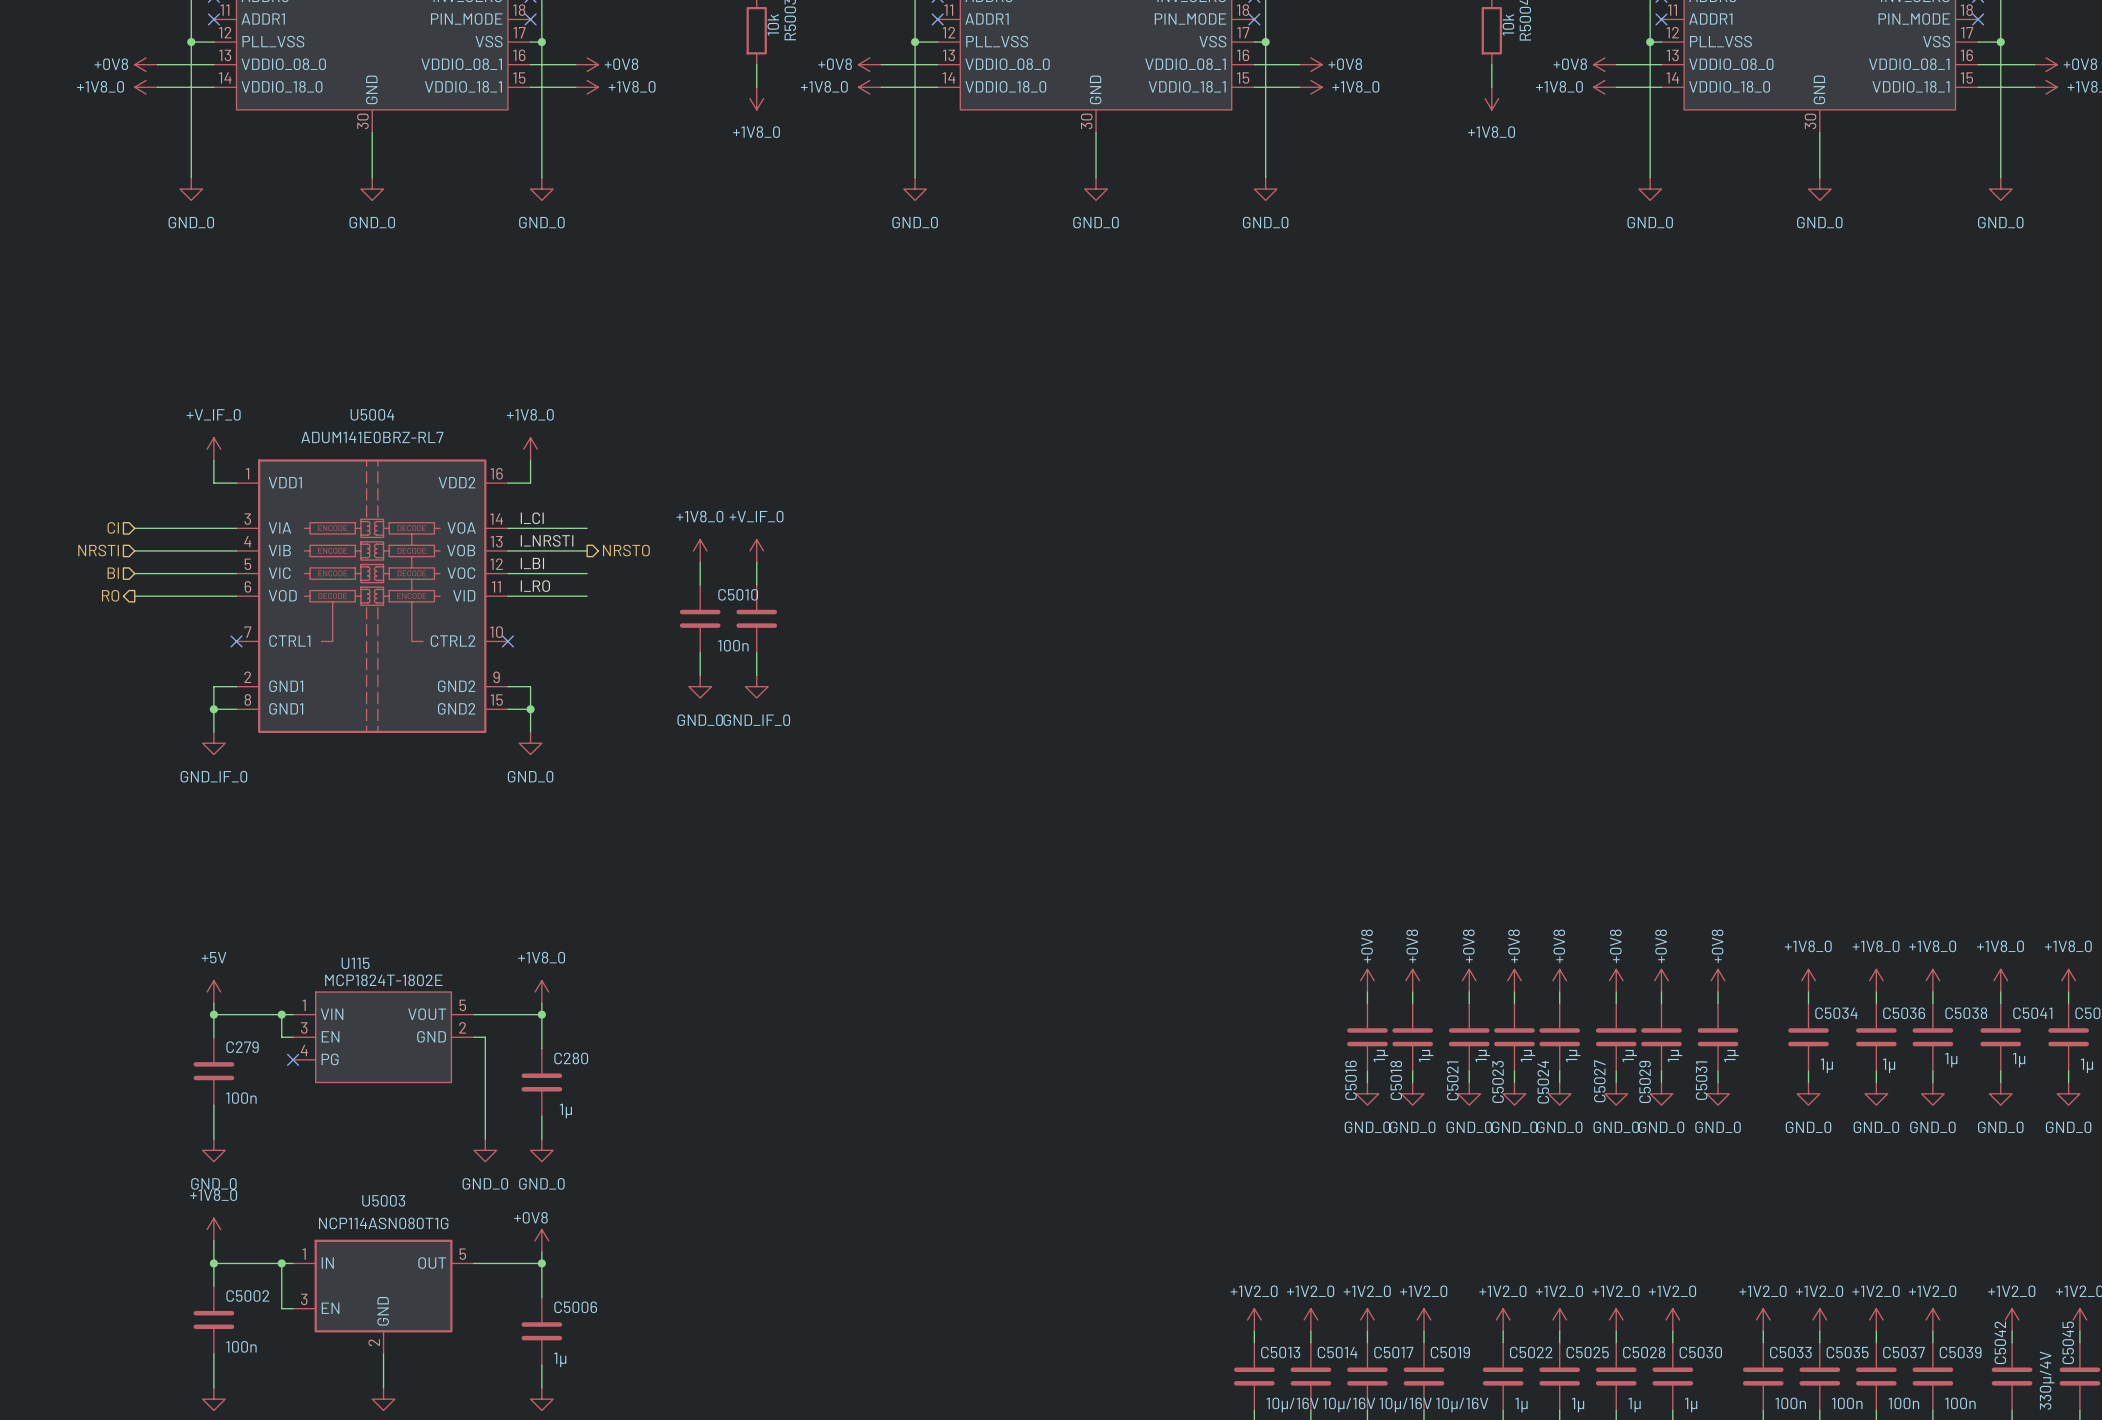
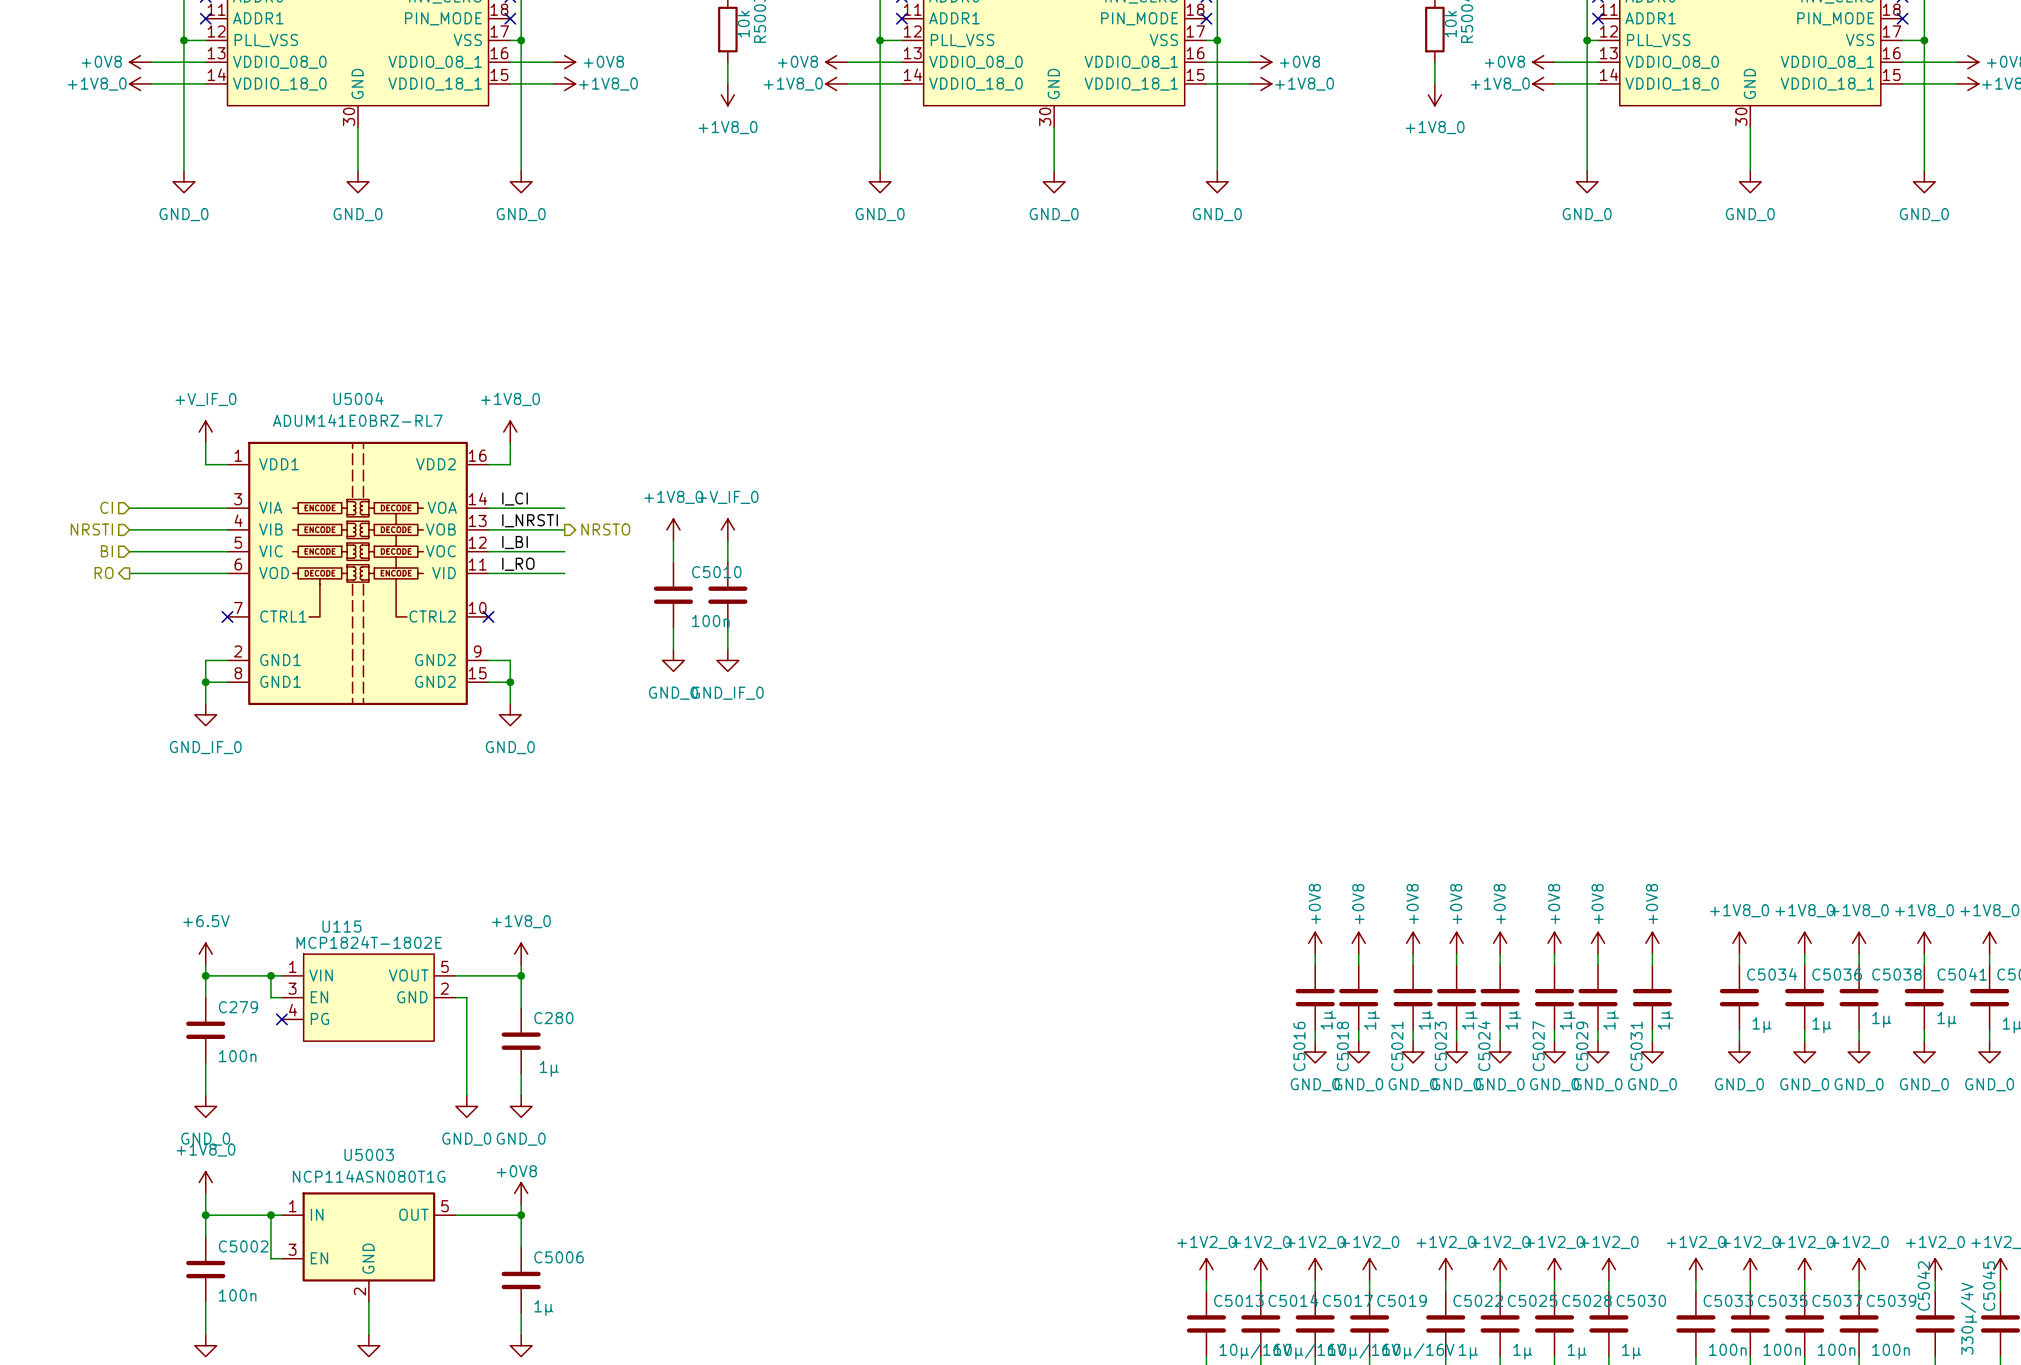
power symbol: +5V (213, 992) -> +6.5V (205, 954)

